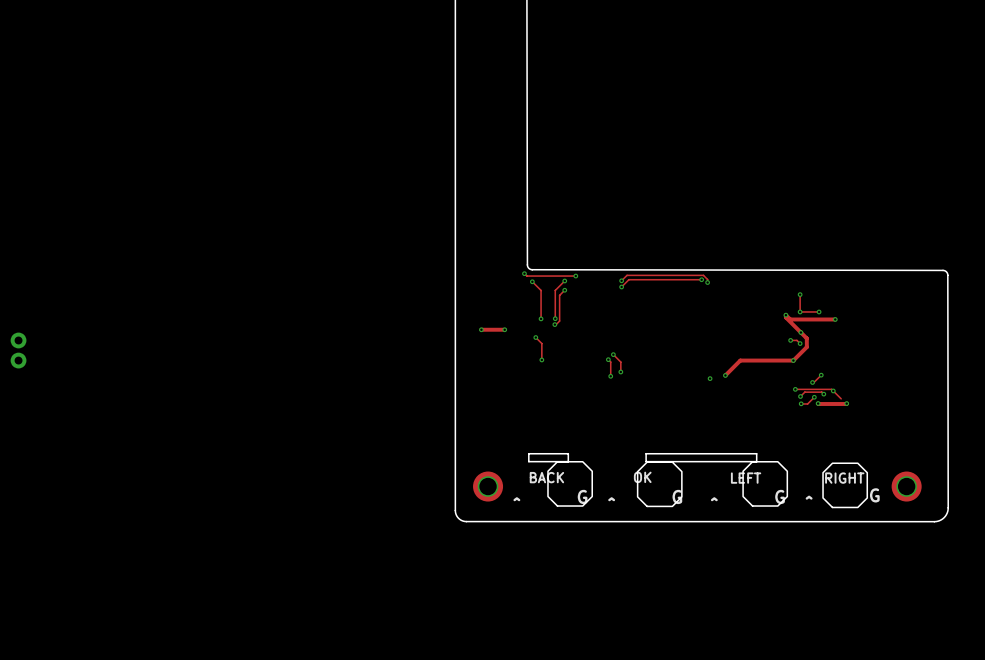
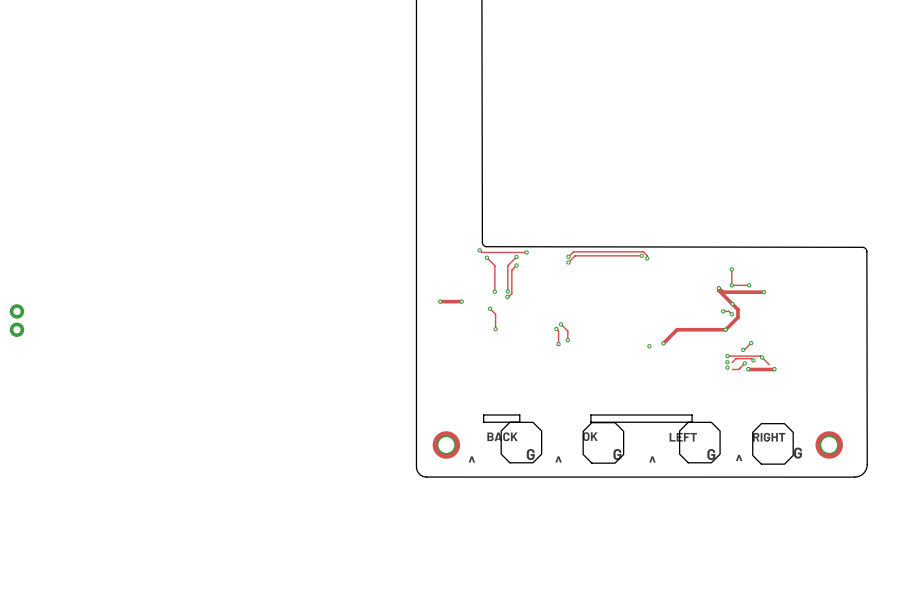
via: none -> (727, 362)
via: (800, 396) -> none
via: none -> (727, 367)
via: (801, 403) -> none

